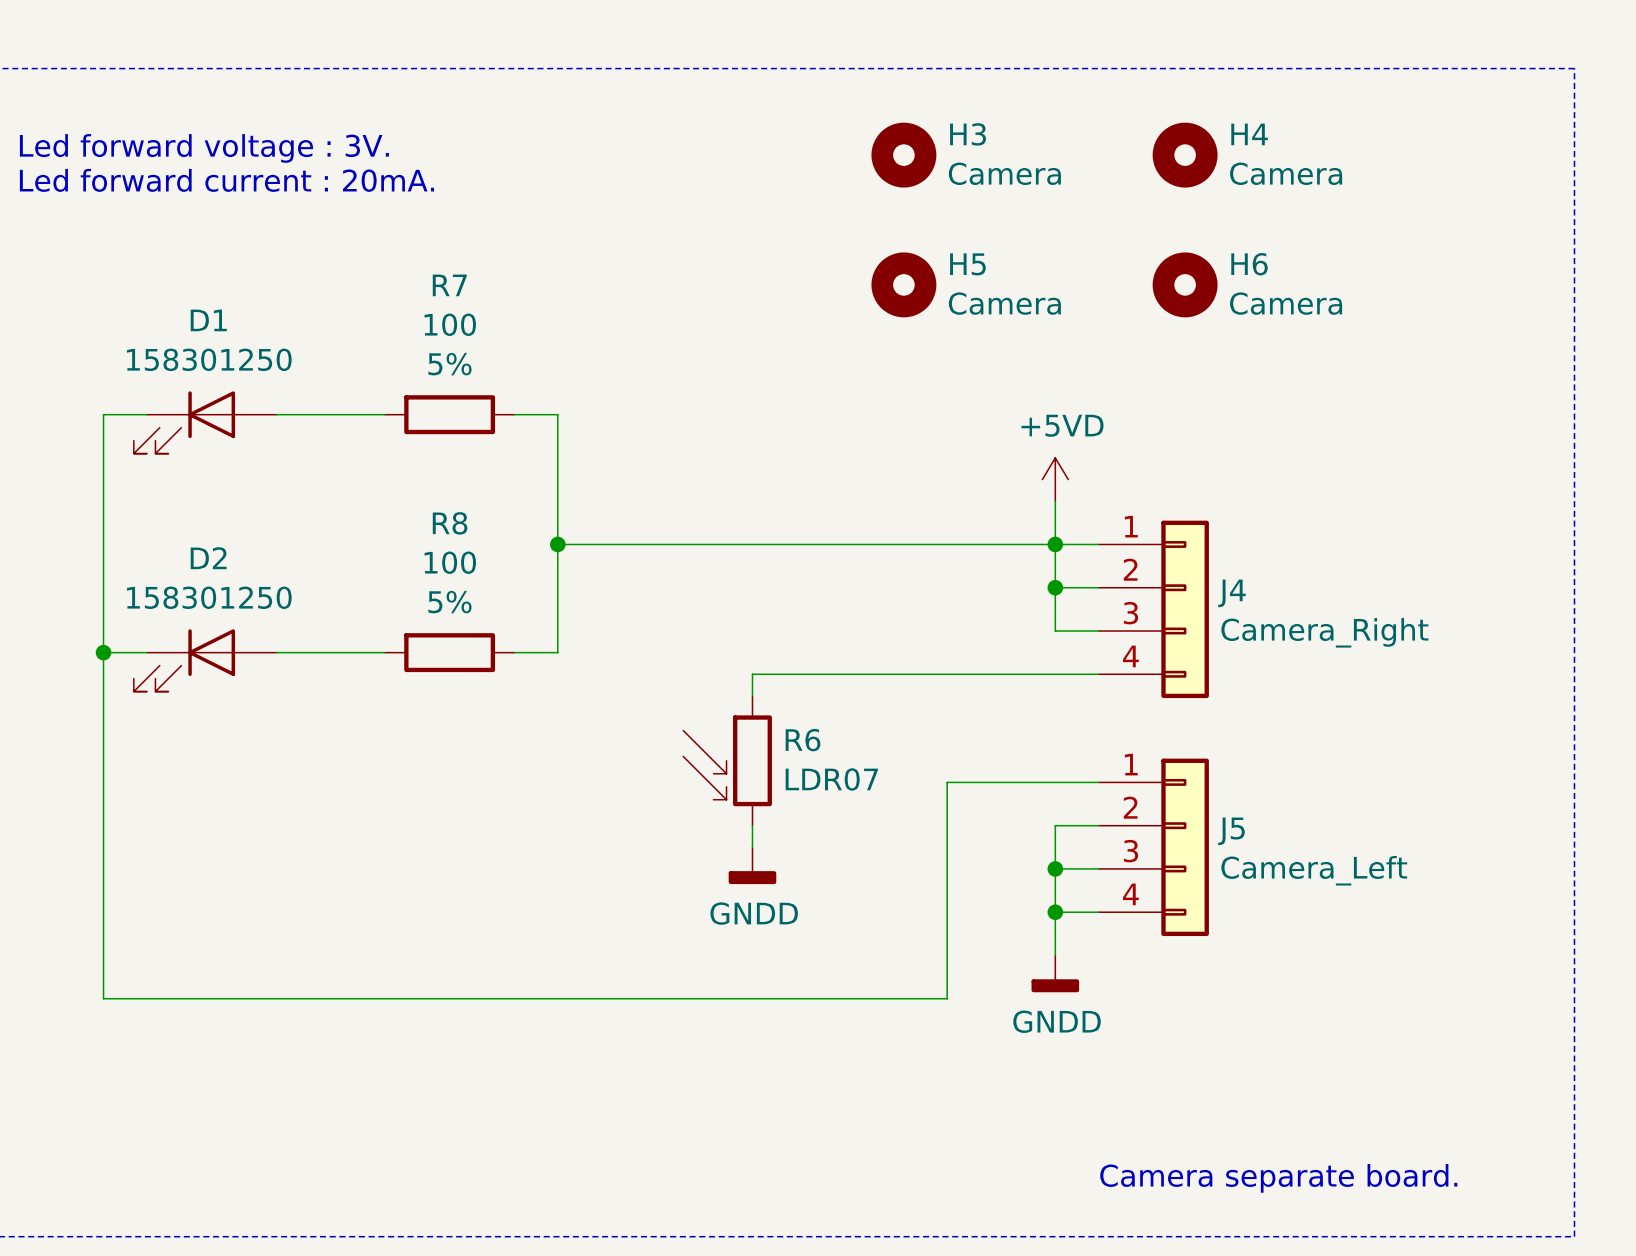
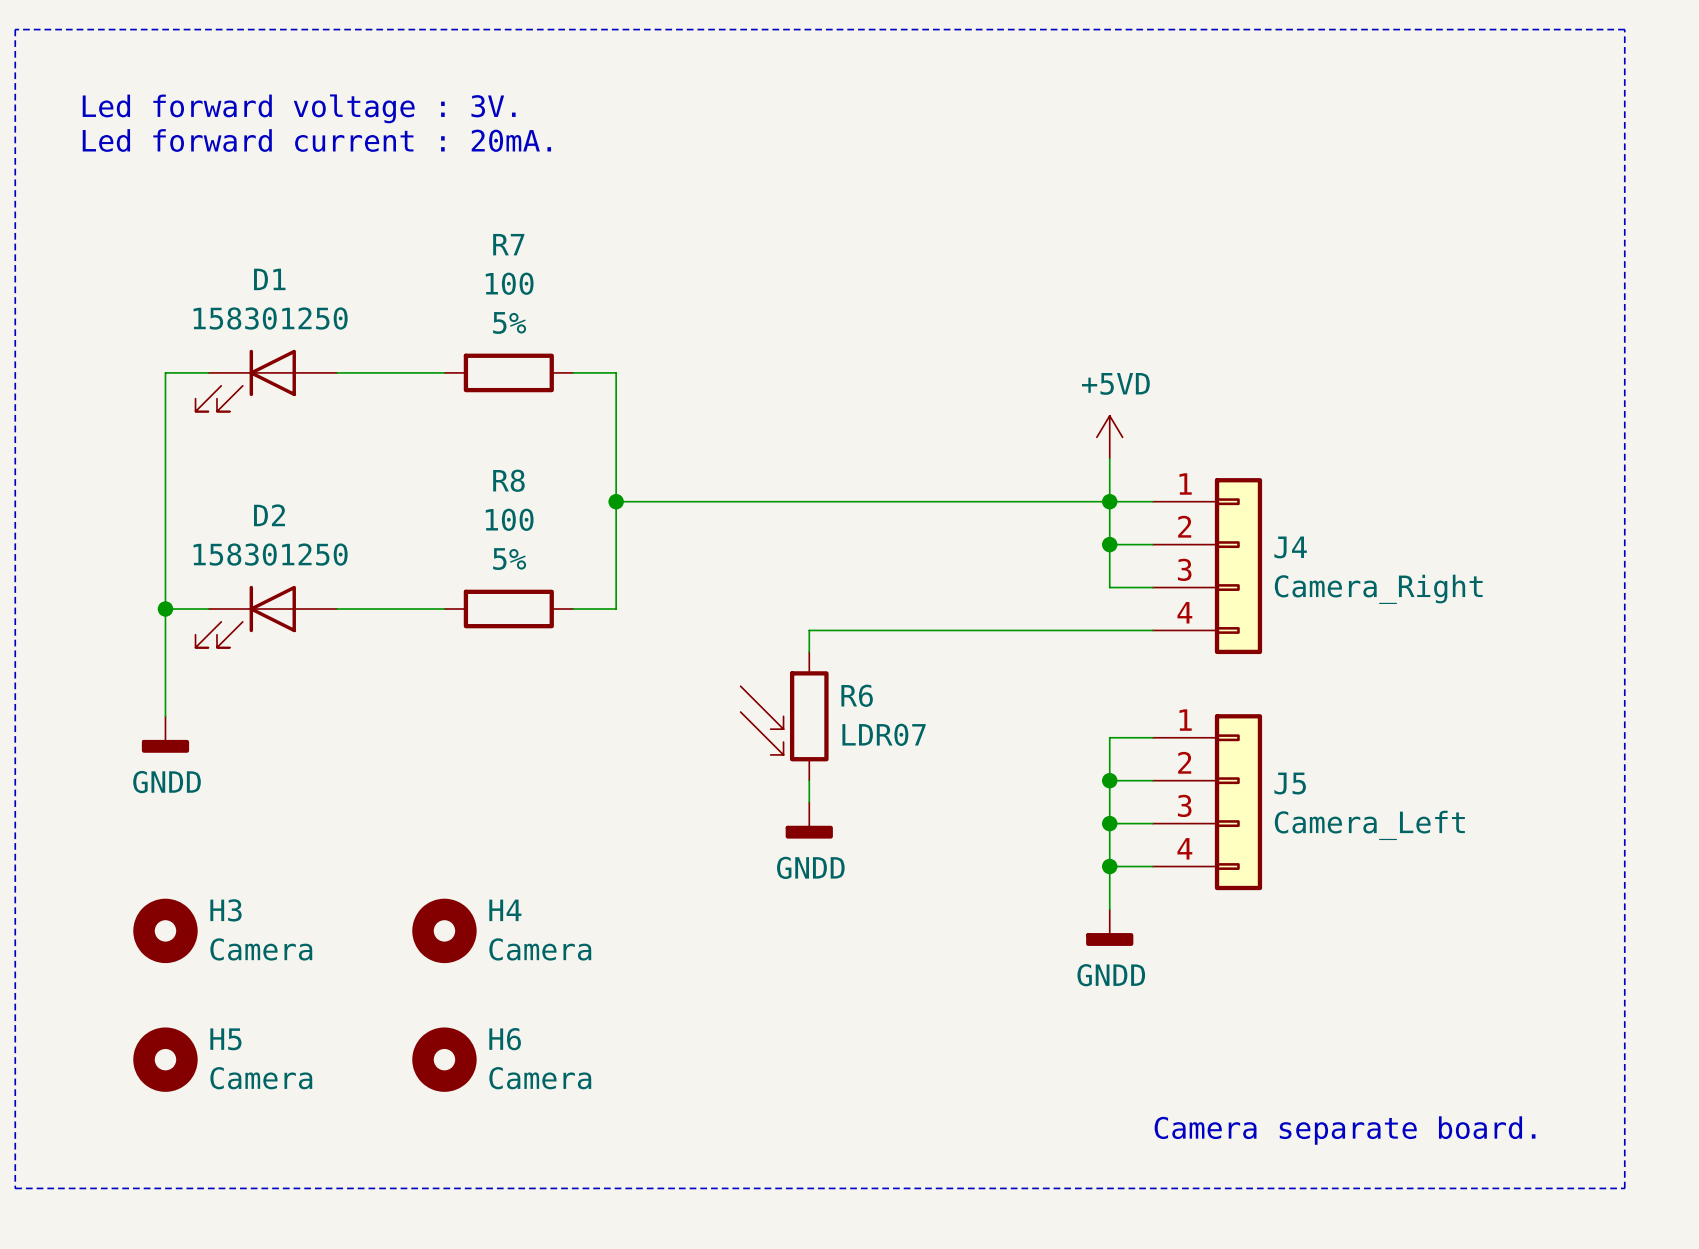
H3 position: (903, 155) -> (165, 930)
H4 position: (1185, 155) -> (444, 930)
H5 position: (903, 284) -> (165, 1059)
H6 position: (1185, 284) -> (444, 1059)
wire: (103, 760) (103, 998) (947, 998) (947, 782) (1055, 782) -> (1109, 780) (1109, 737)
power symbol: none -> GNDD (165, 734)
junction: none -> (1109, 780)

